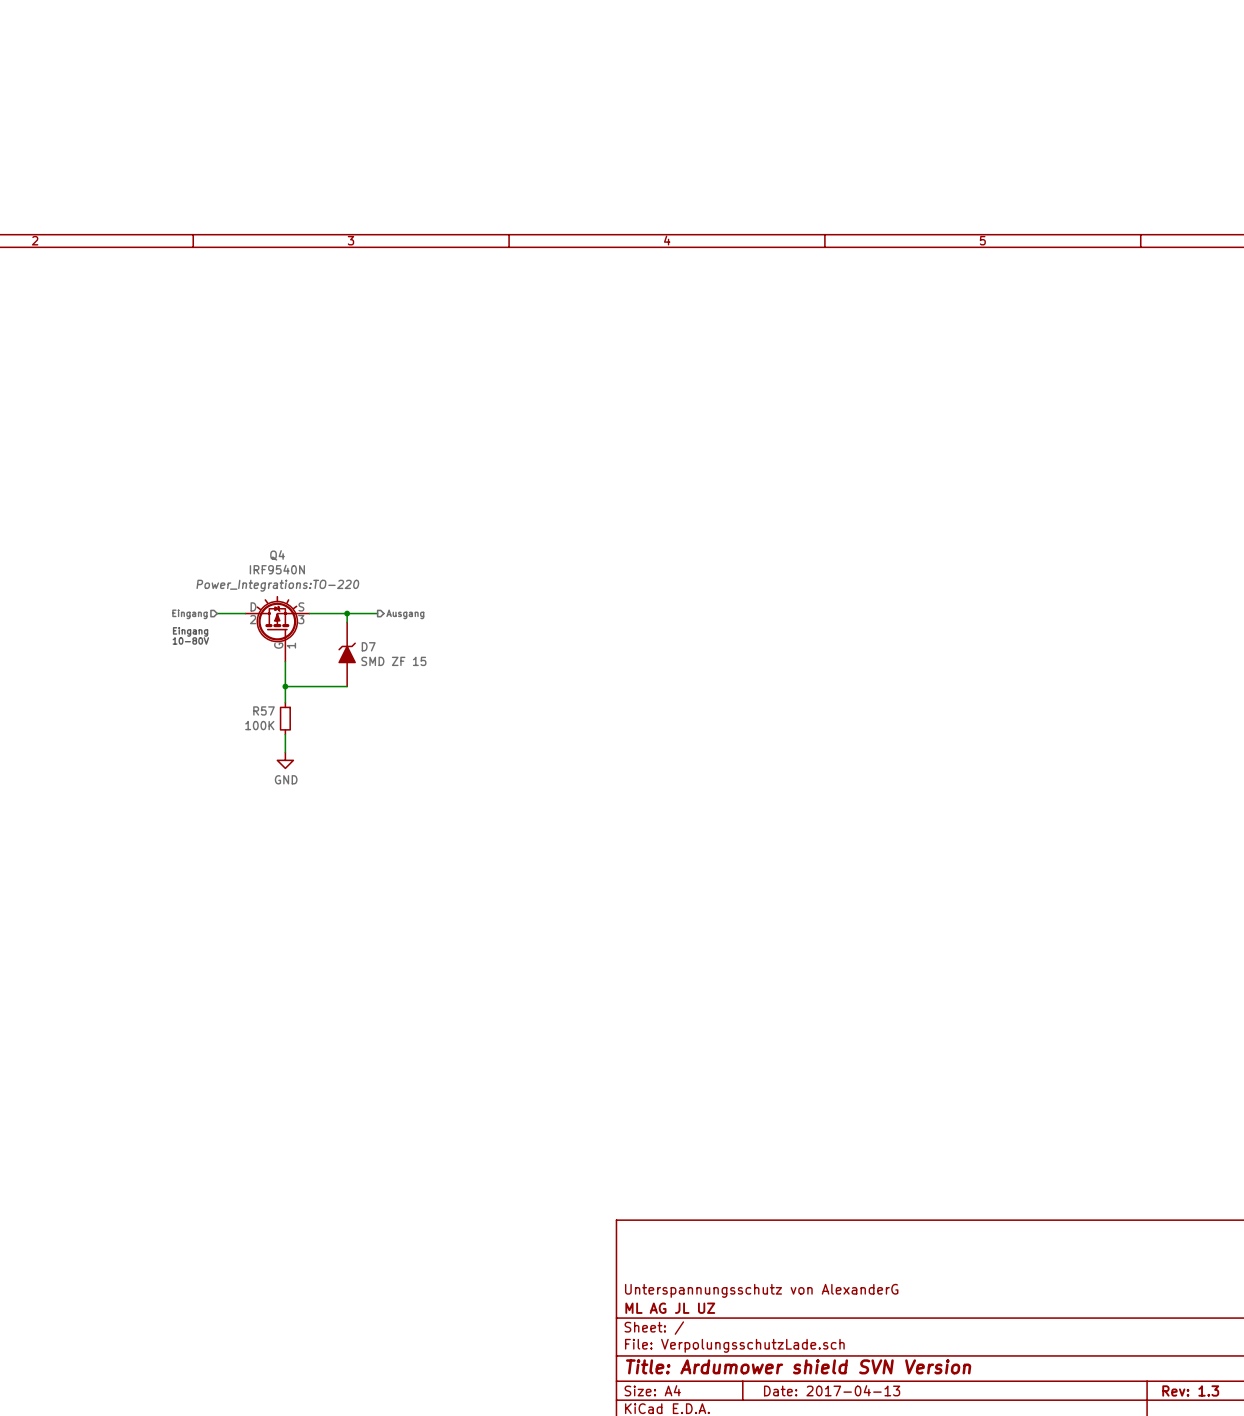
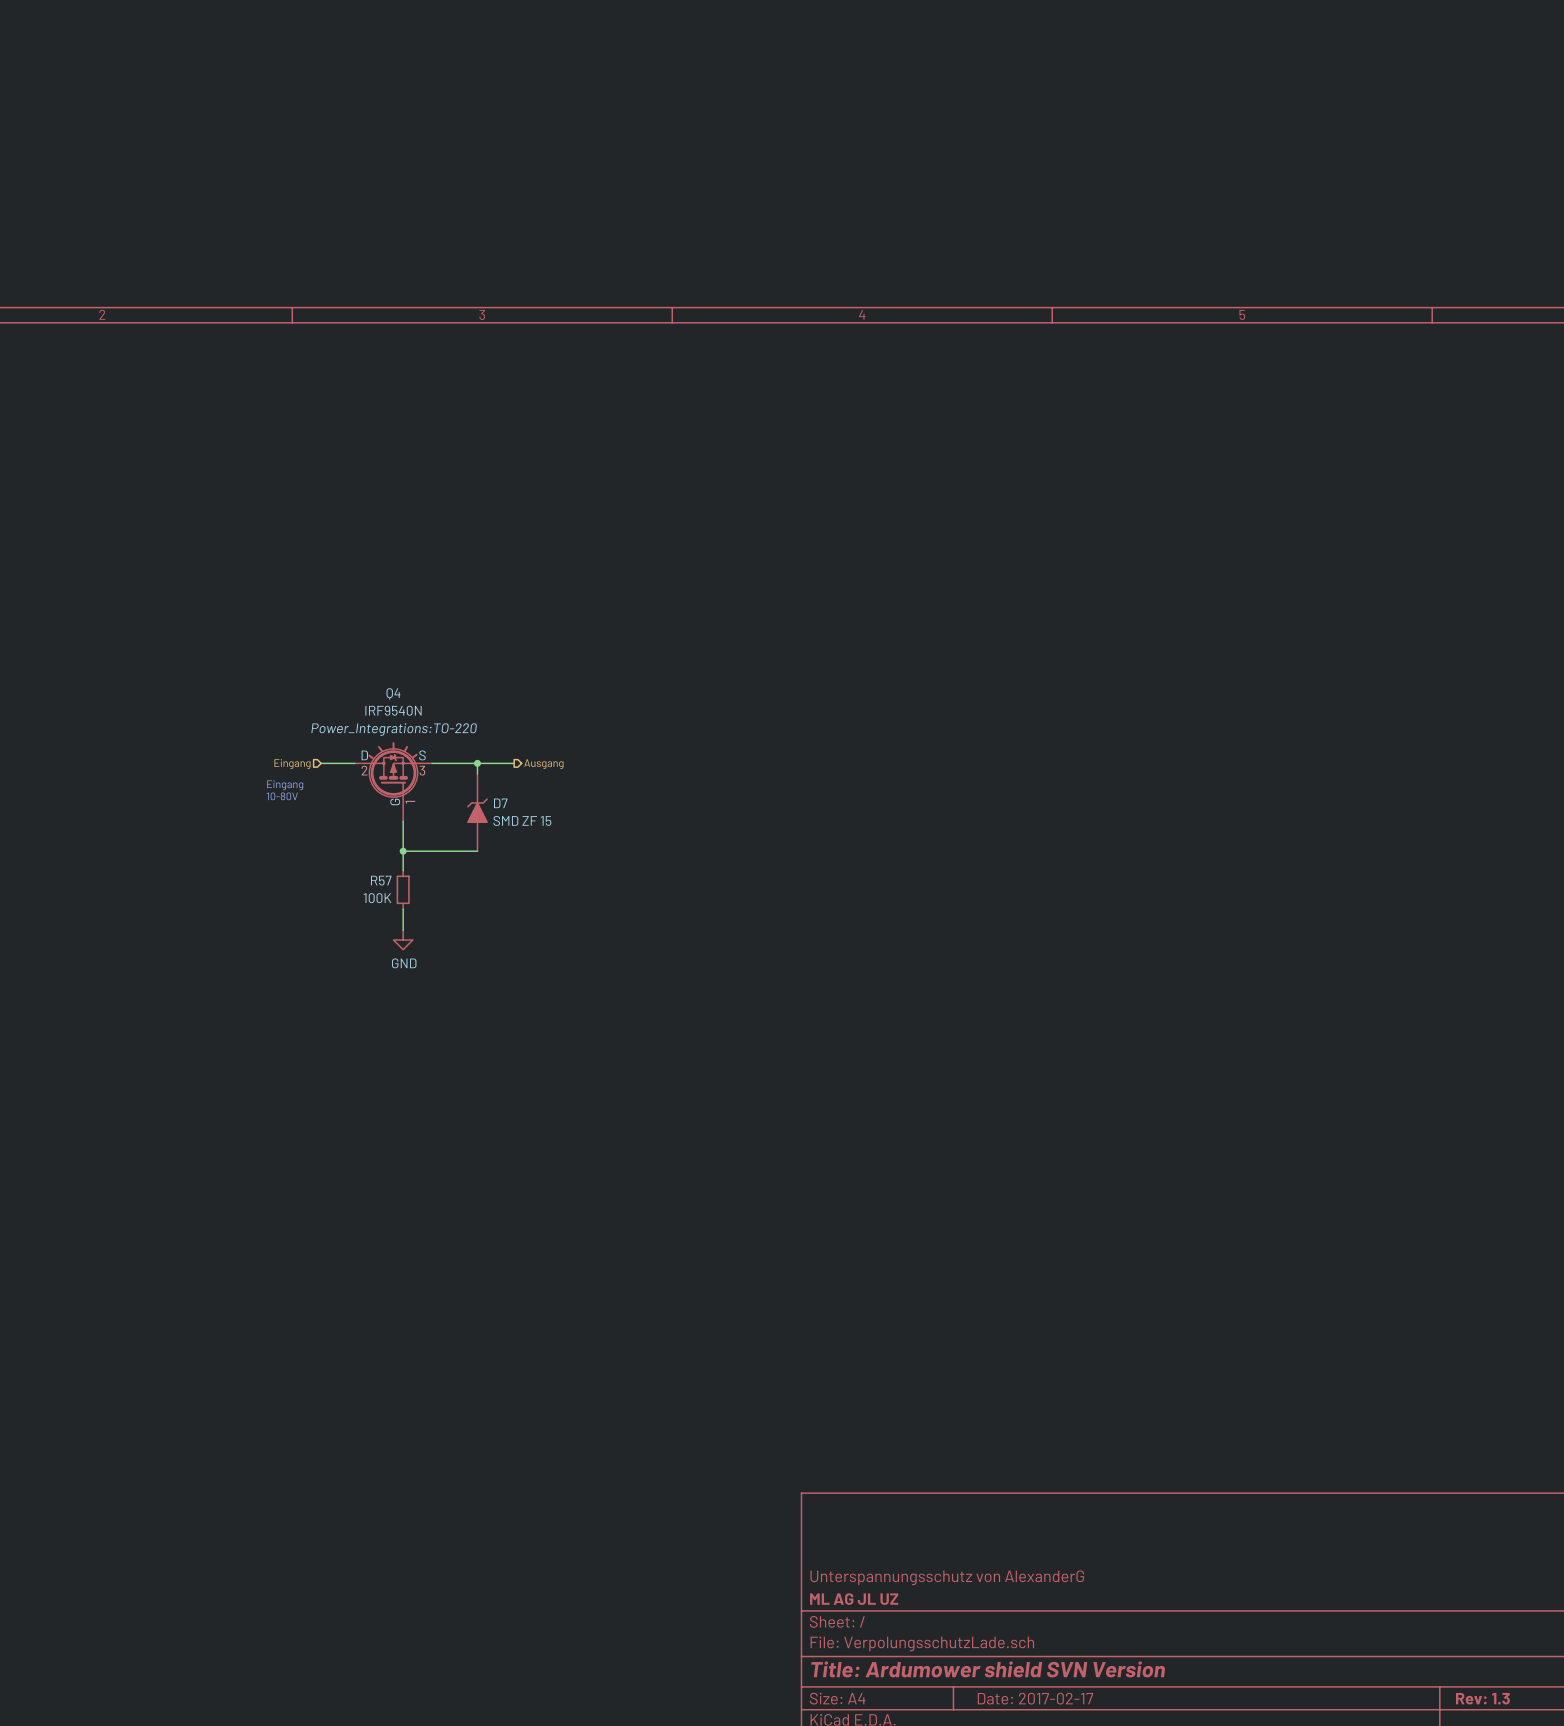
title block: Date: 2017-04-13 (832, 1390) -> Date: 2017-02-17 (1035, 1698)

